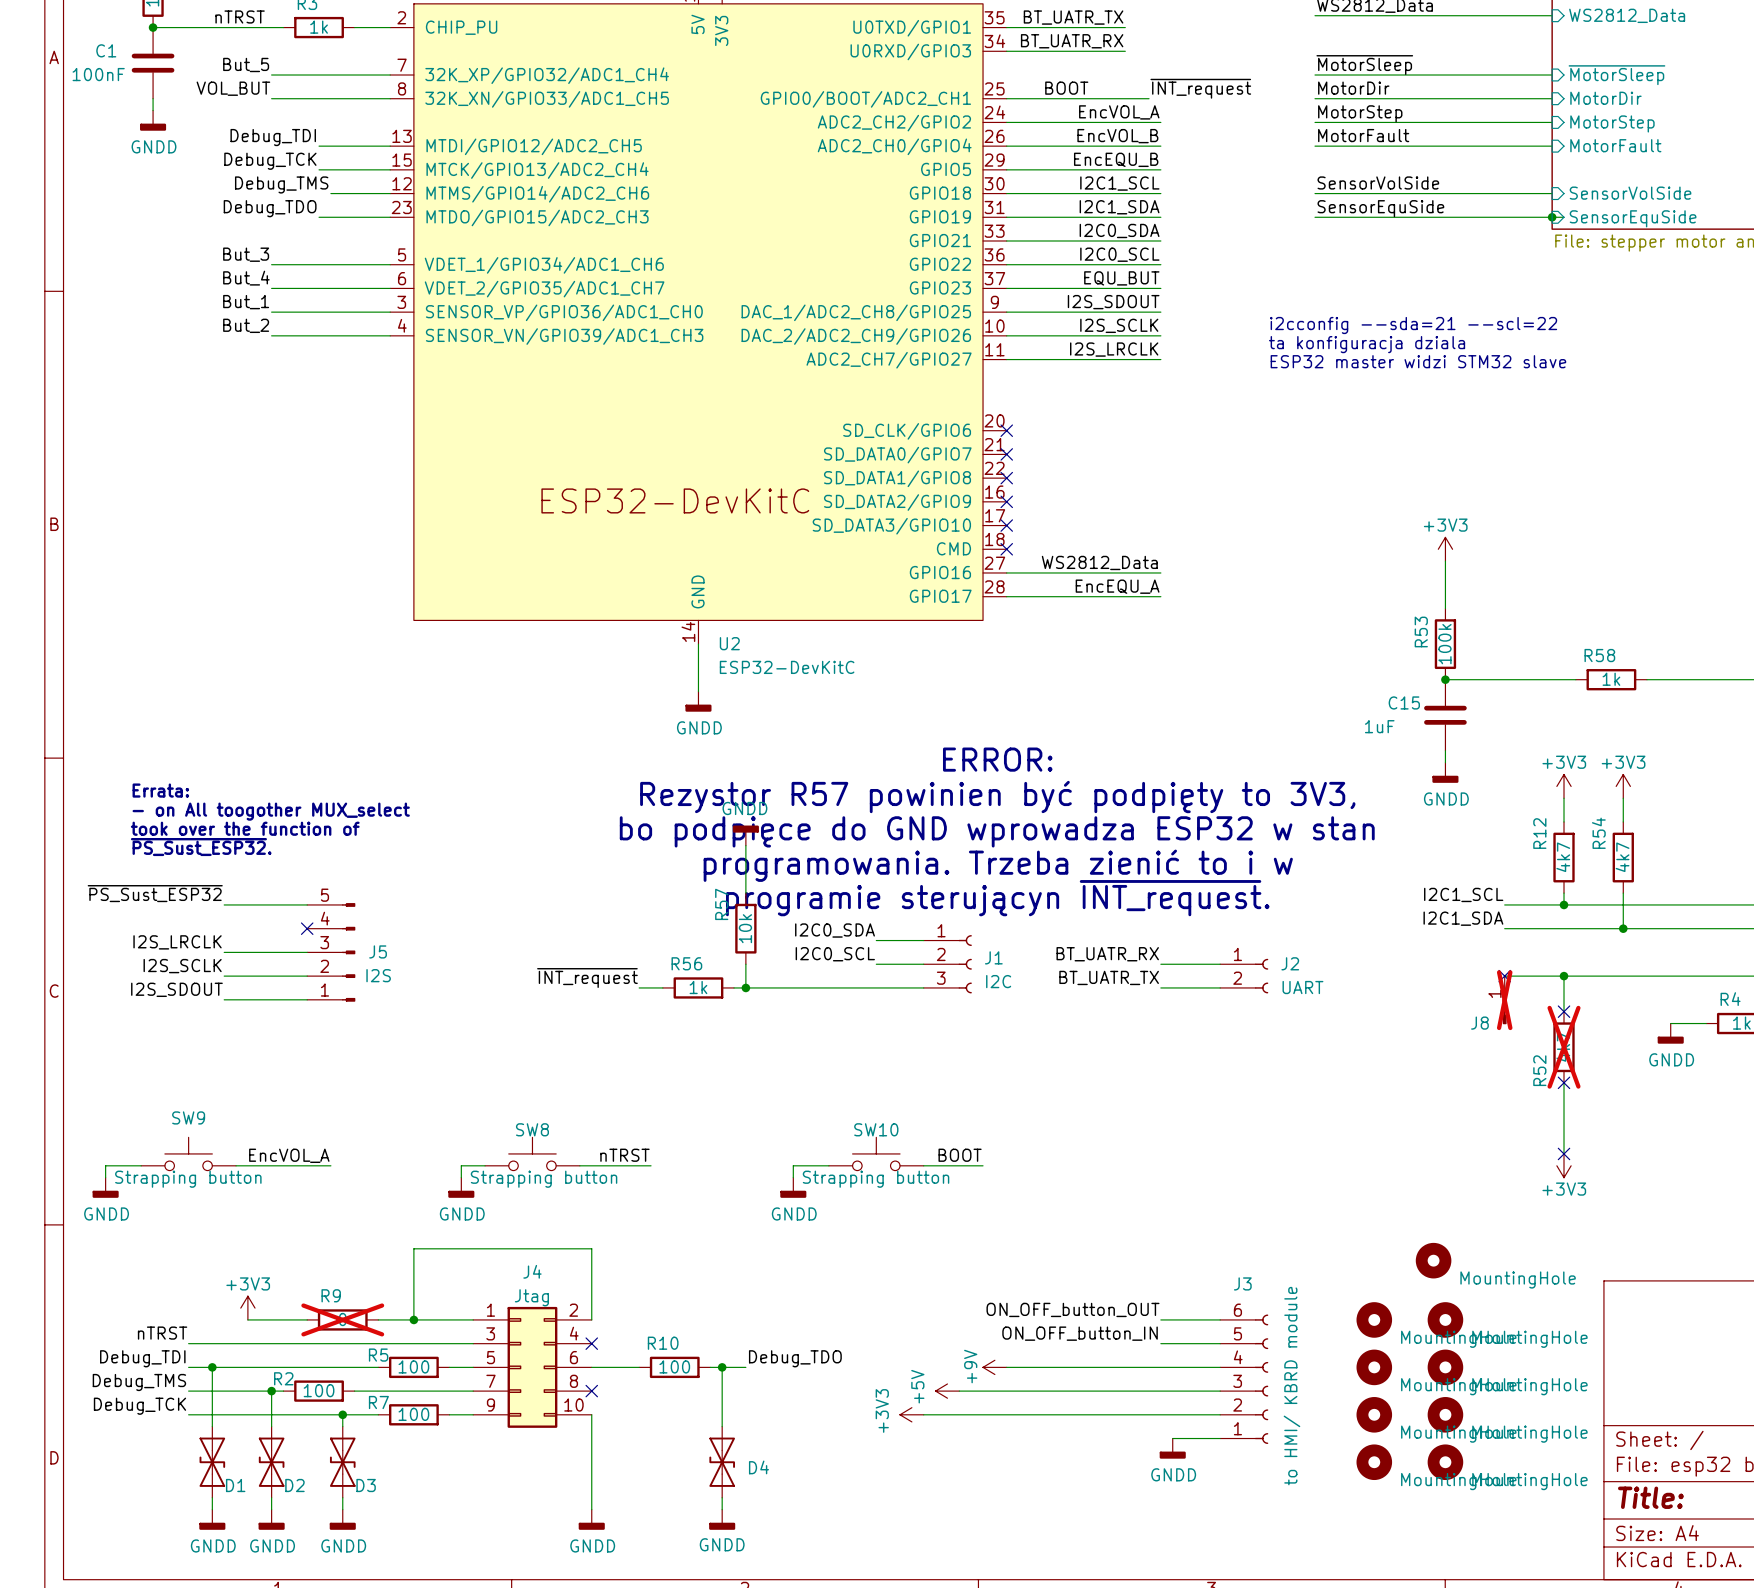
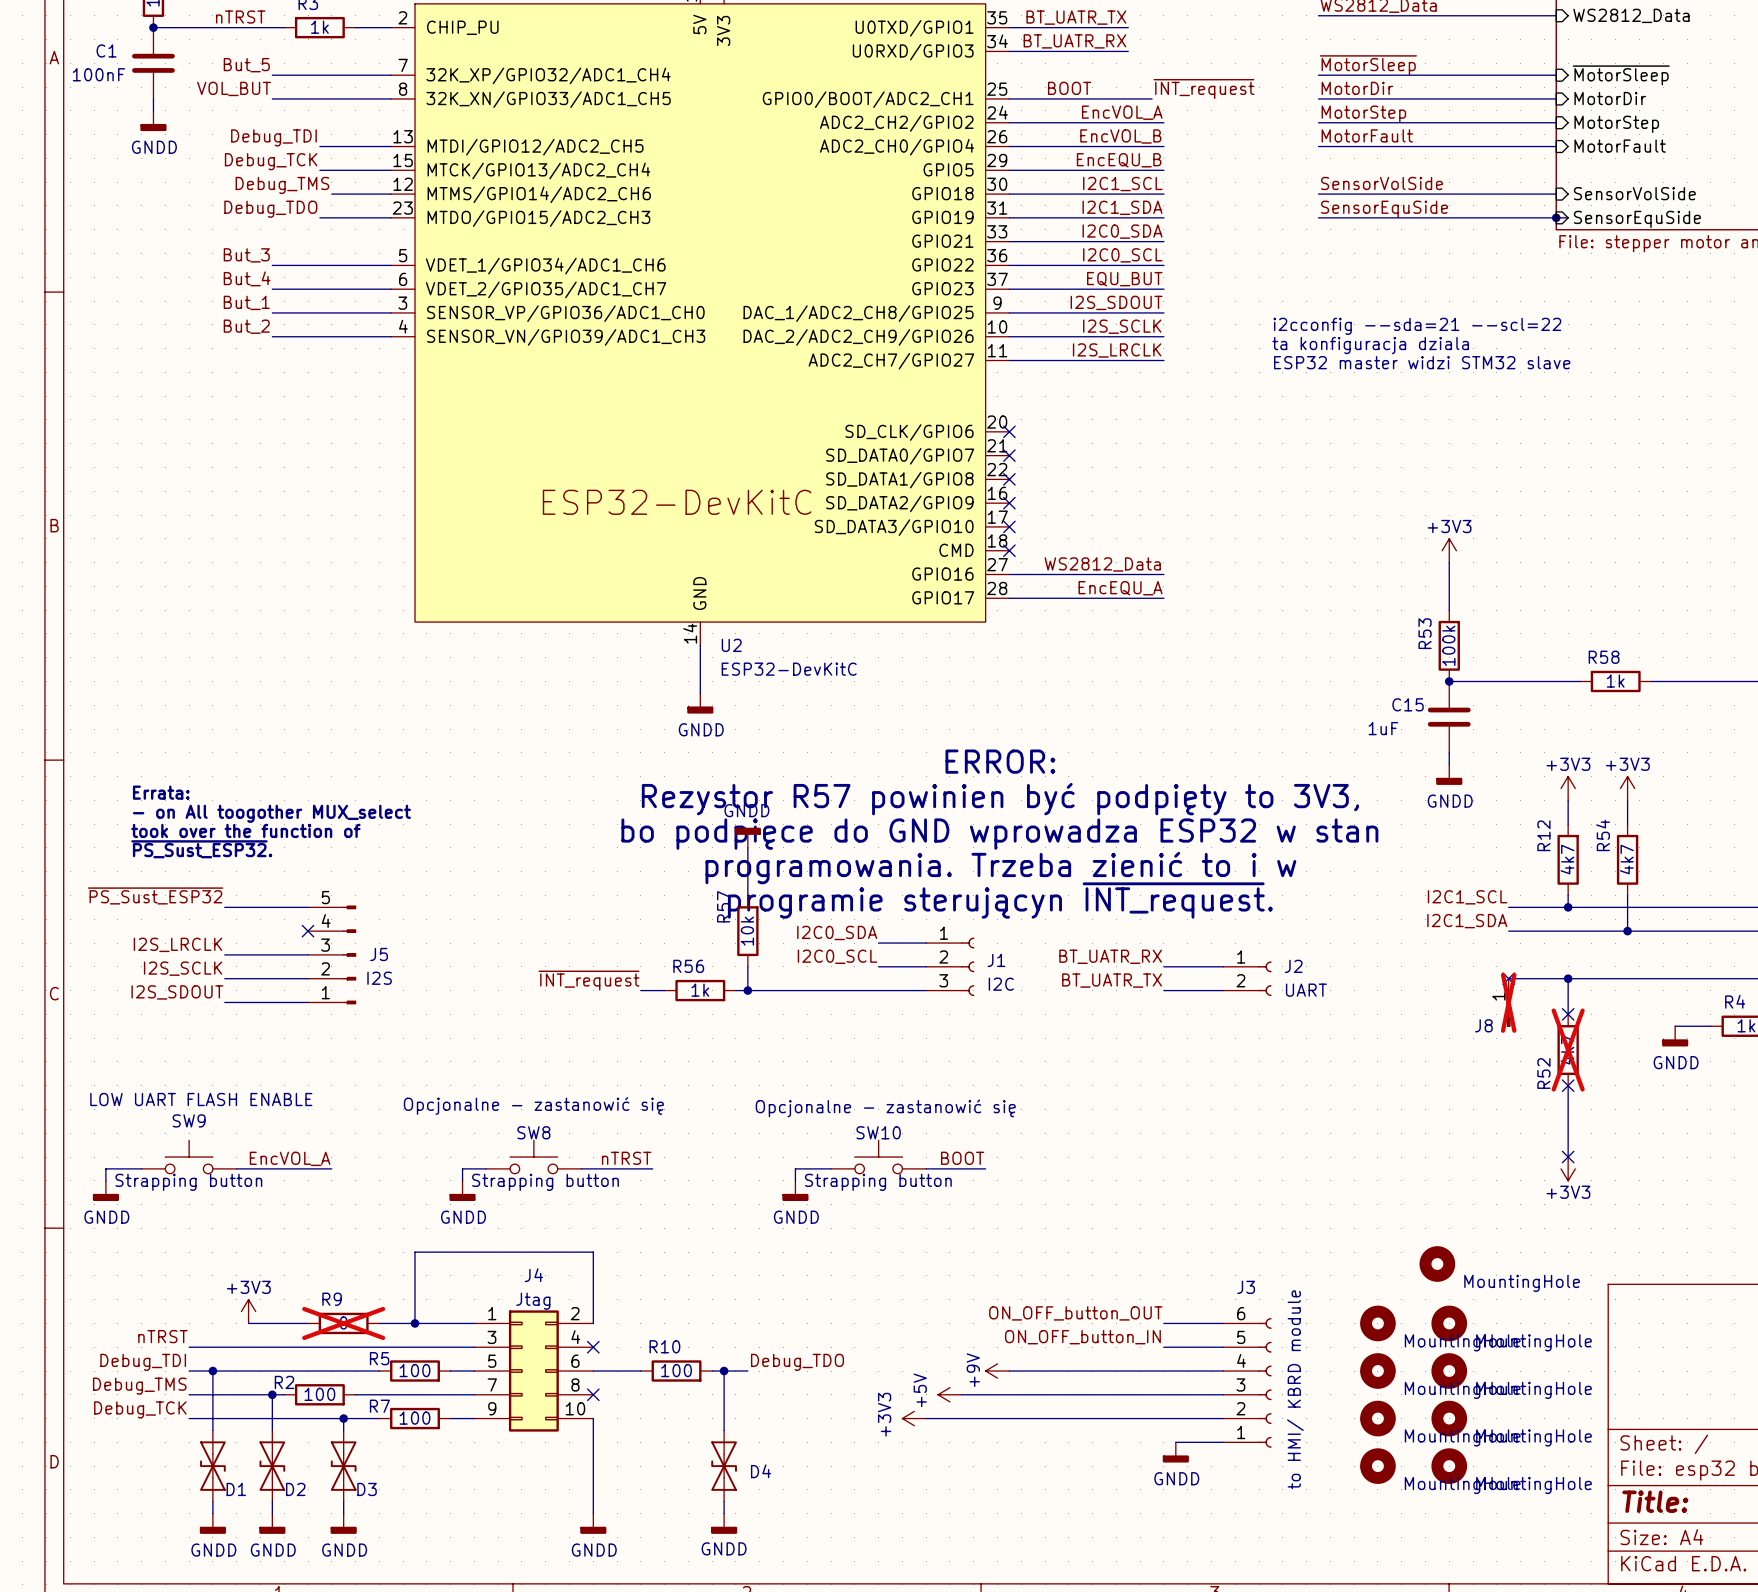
SW9 text: none -> LOW UART FLASH ENABLE (201, 1099)
SW8 text: none -> Opcjonalne - zastanowić się (533, 1105)
SW10 text: none -> Opcjonalne - zastanowić się (885, 1108)

